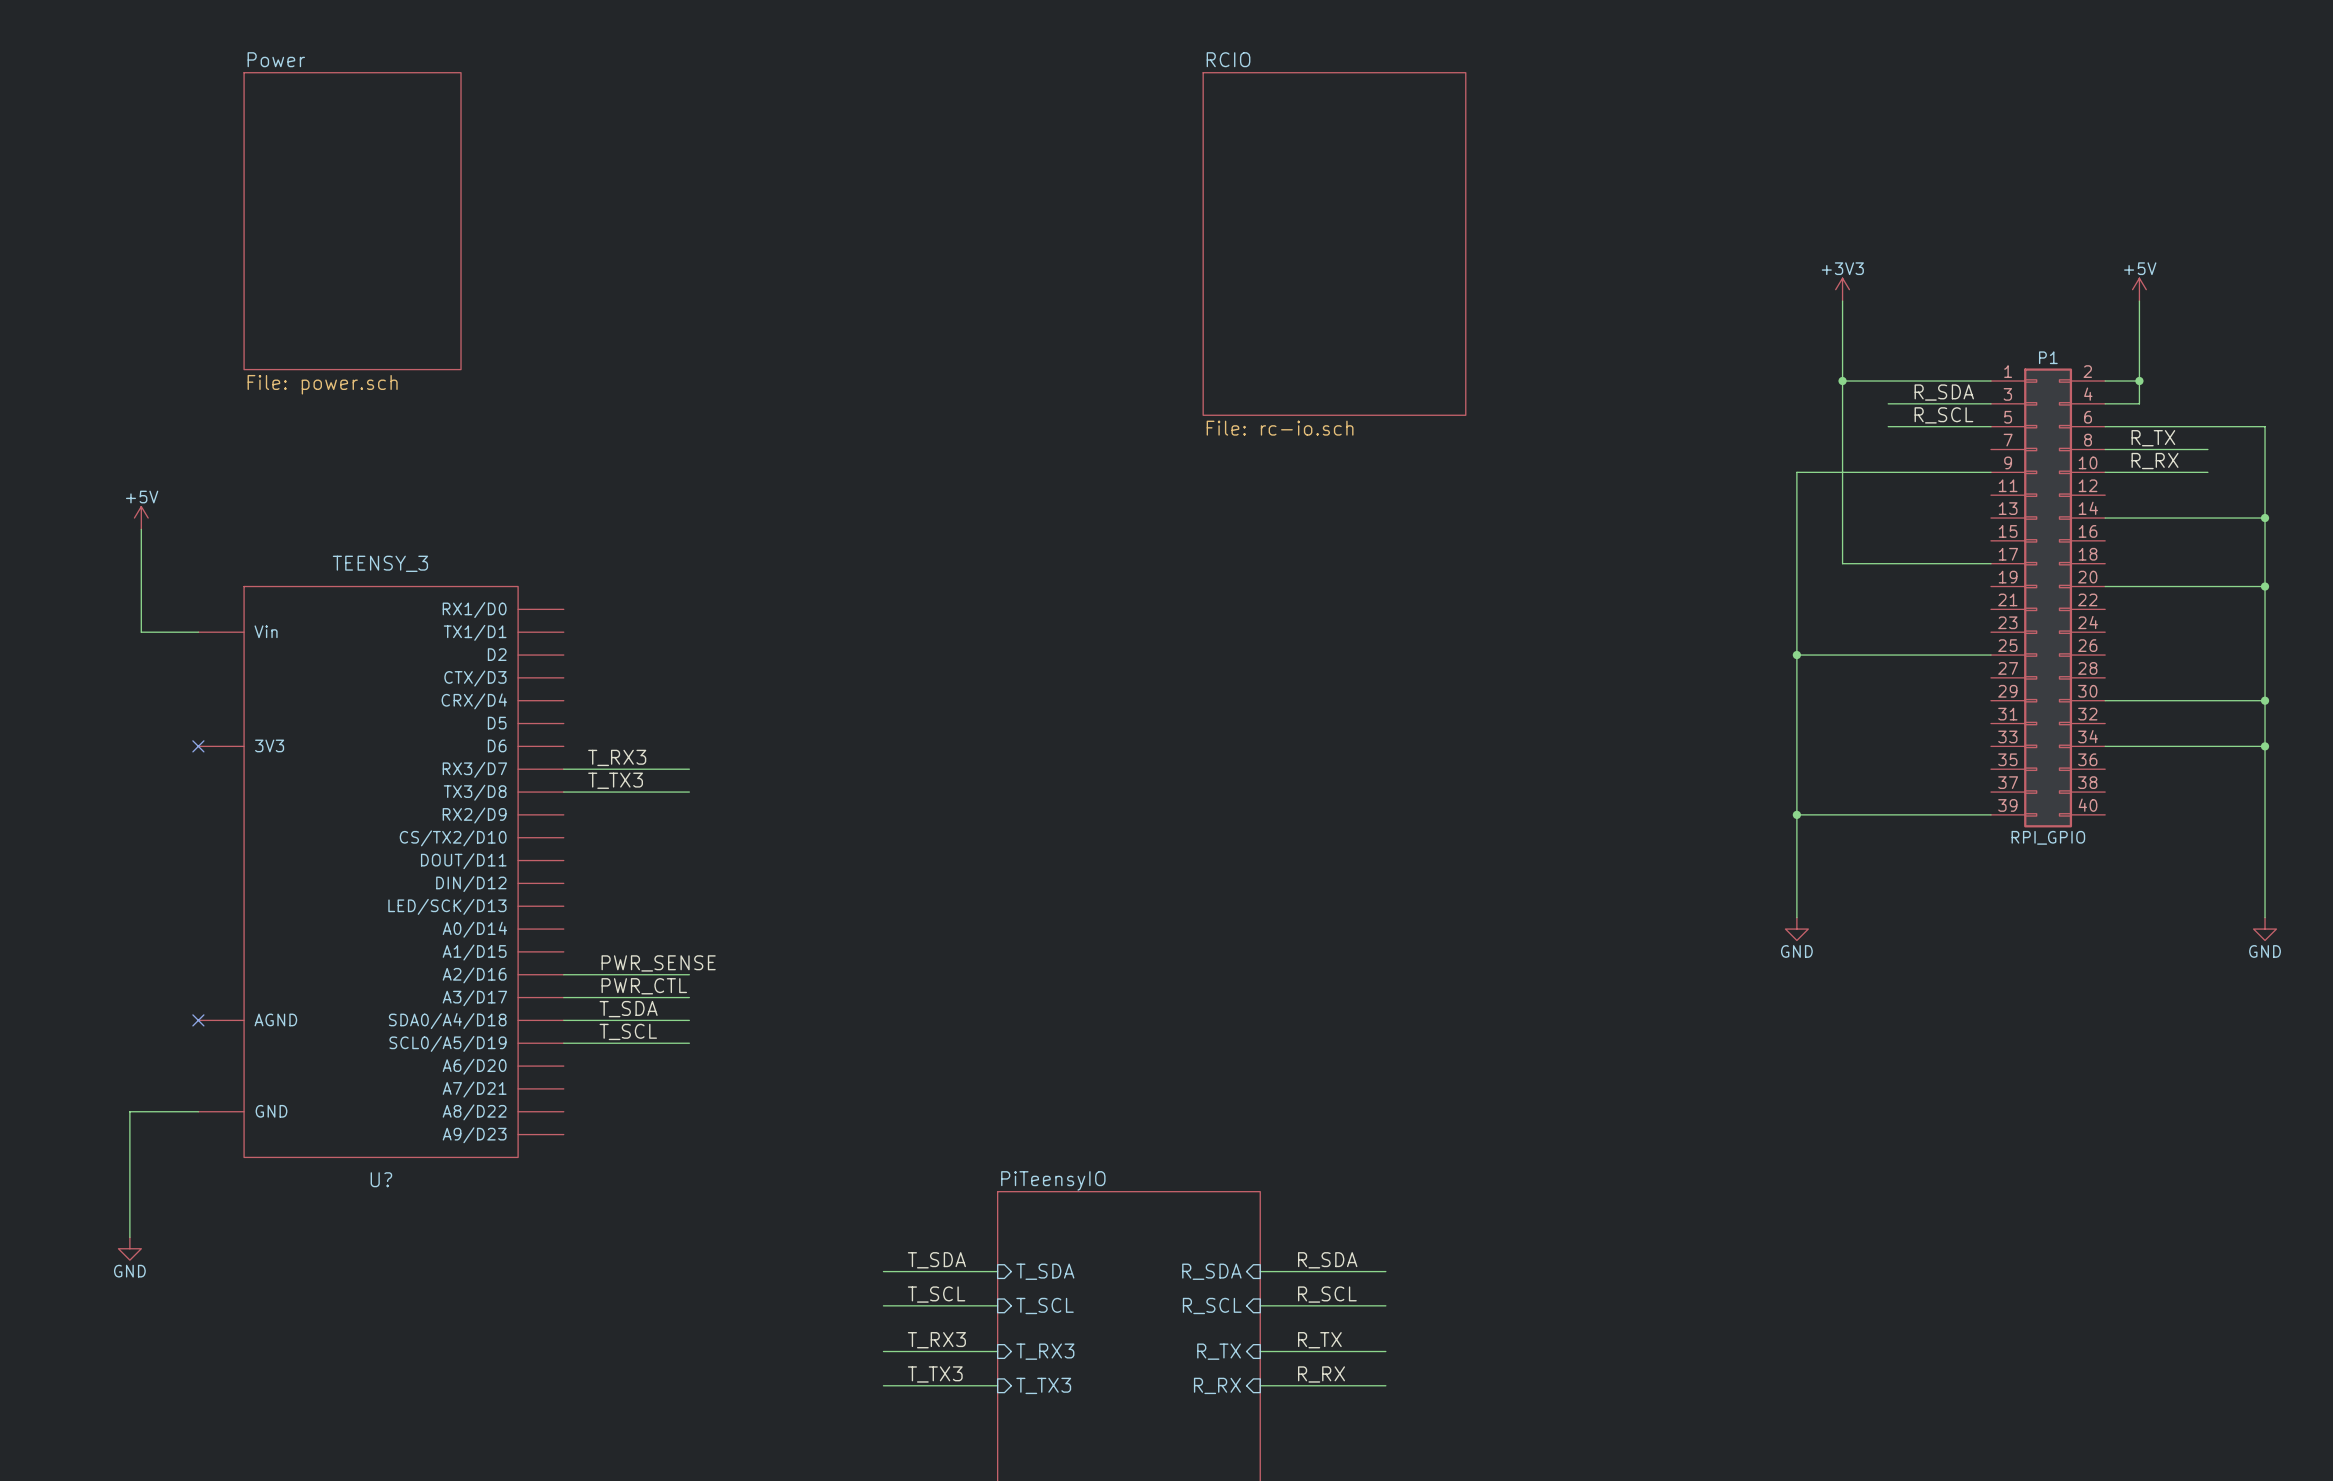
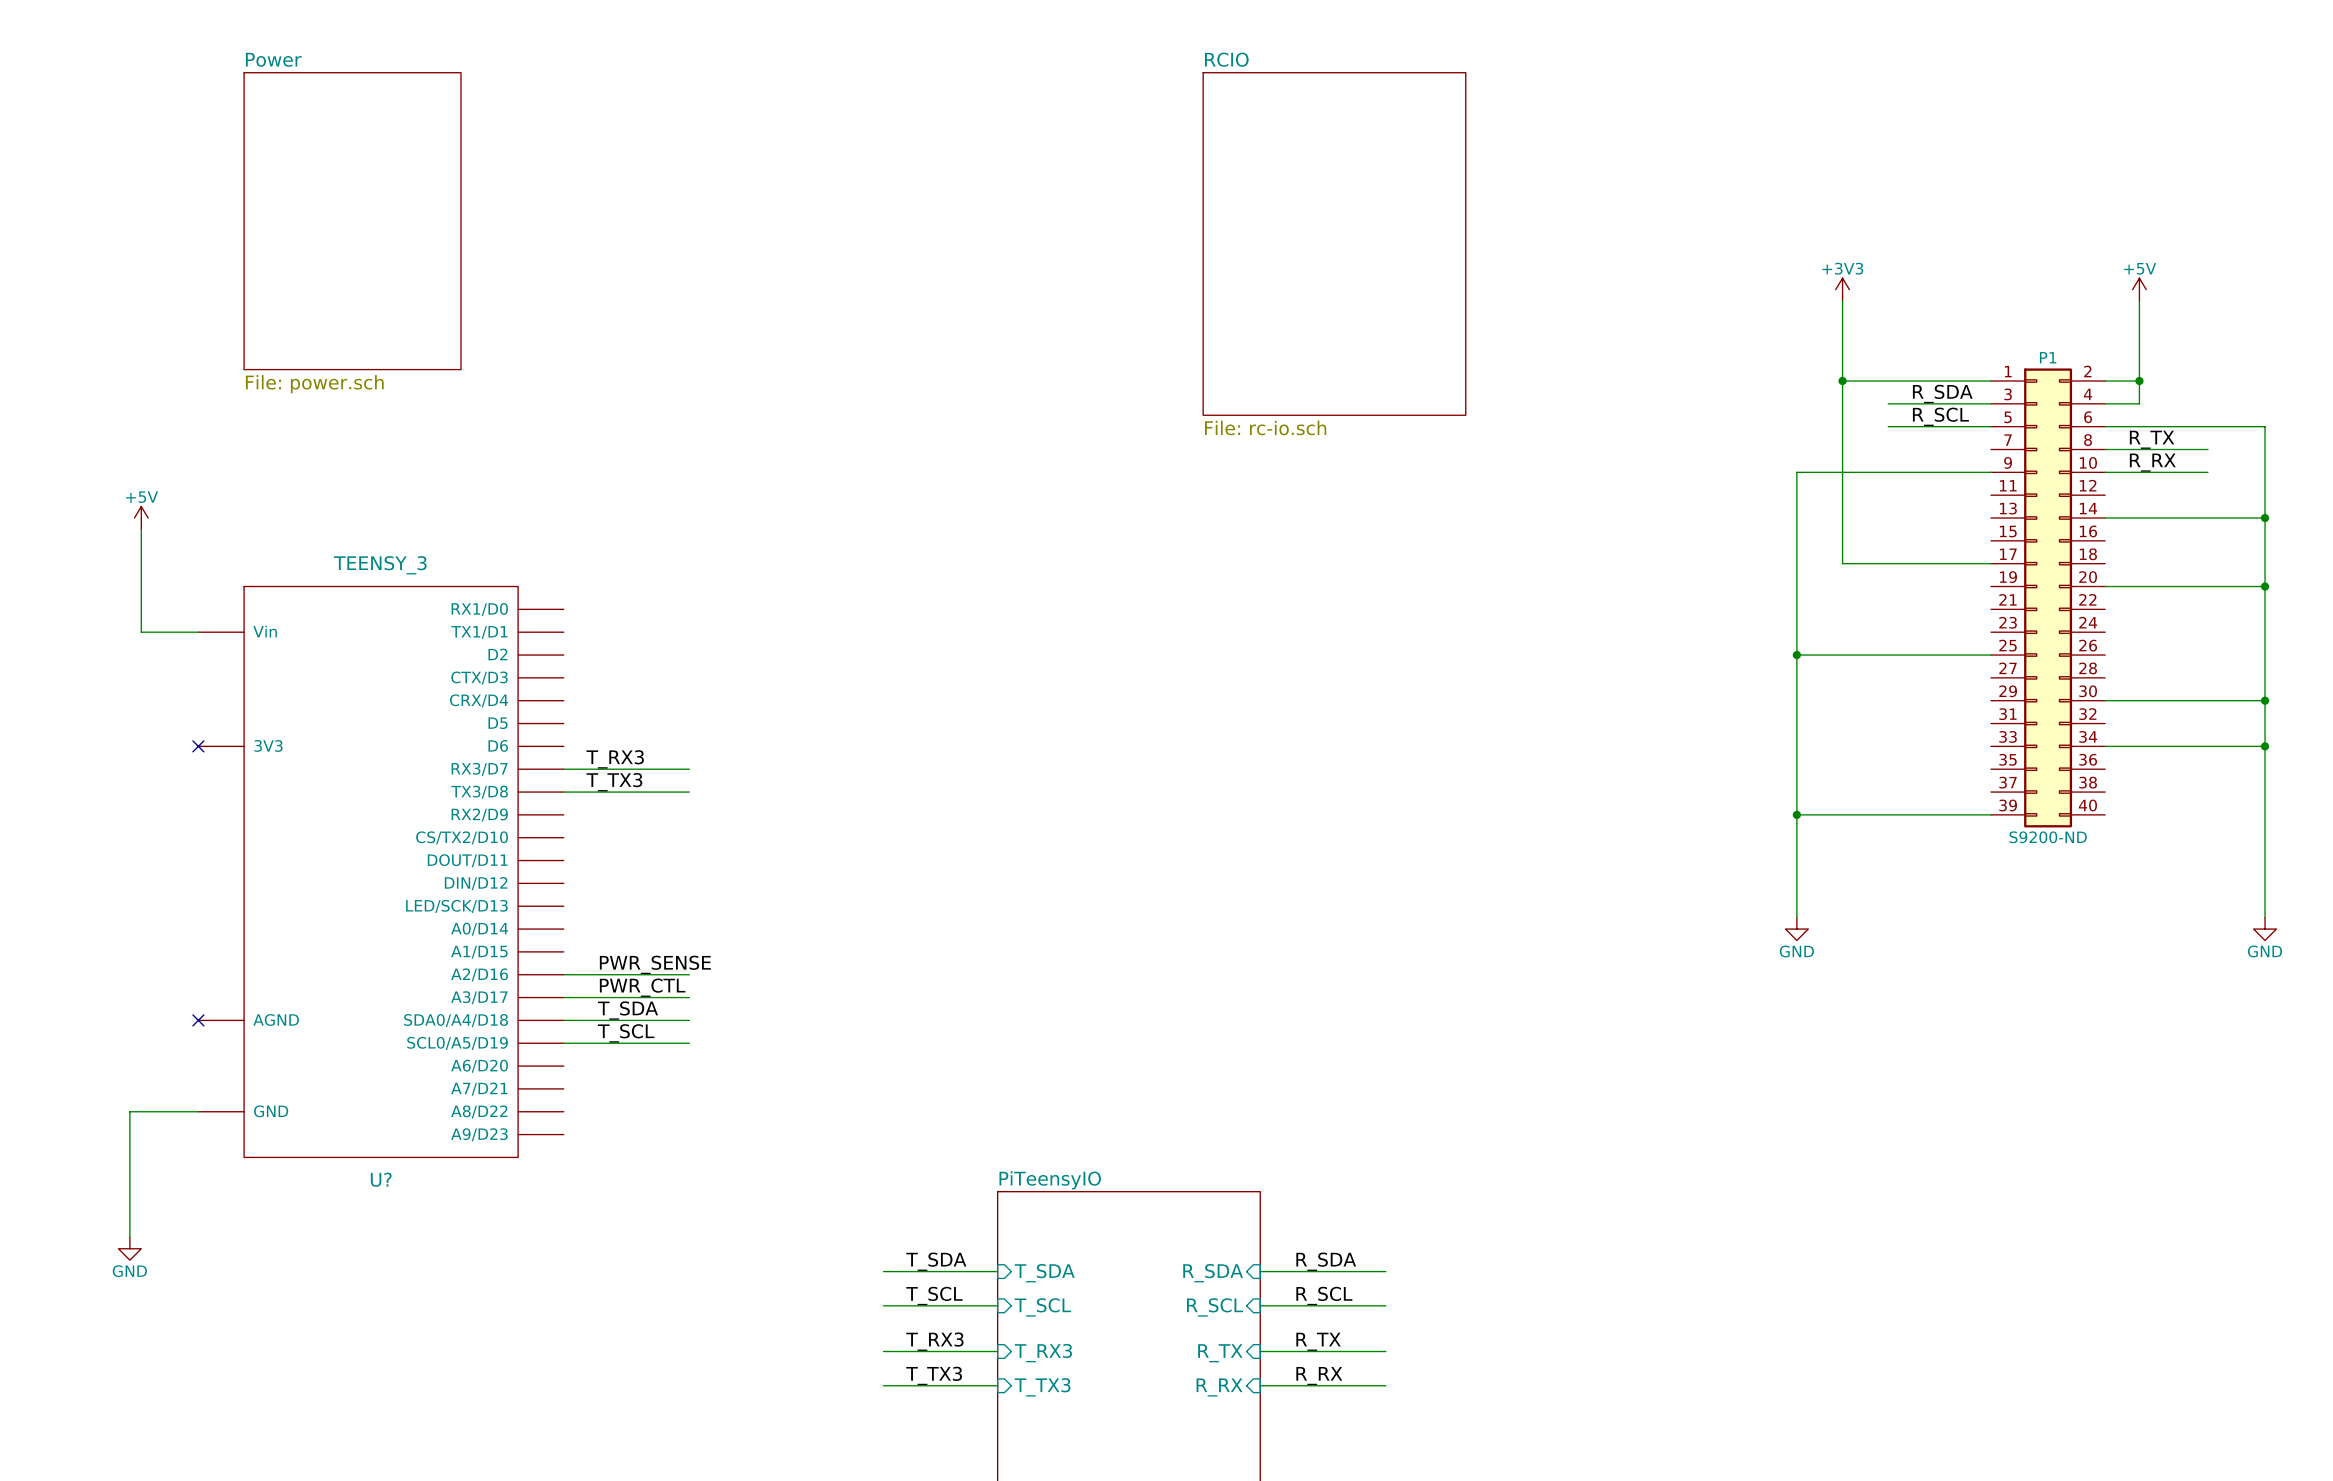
P1 value: RPI_GPIO (2048, 837) -> S9200-ND (2048, 837)

